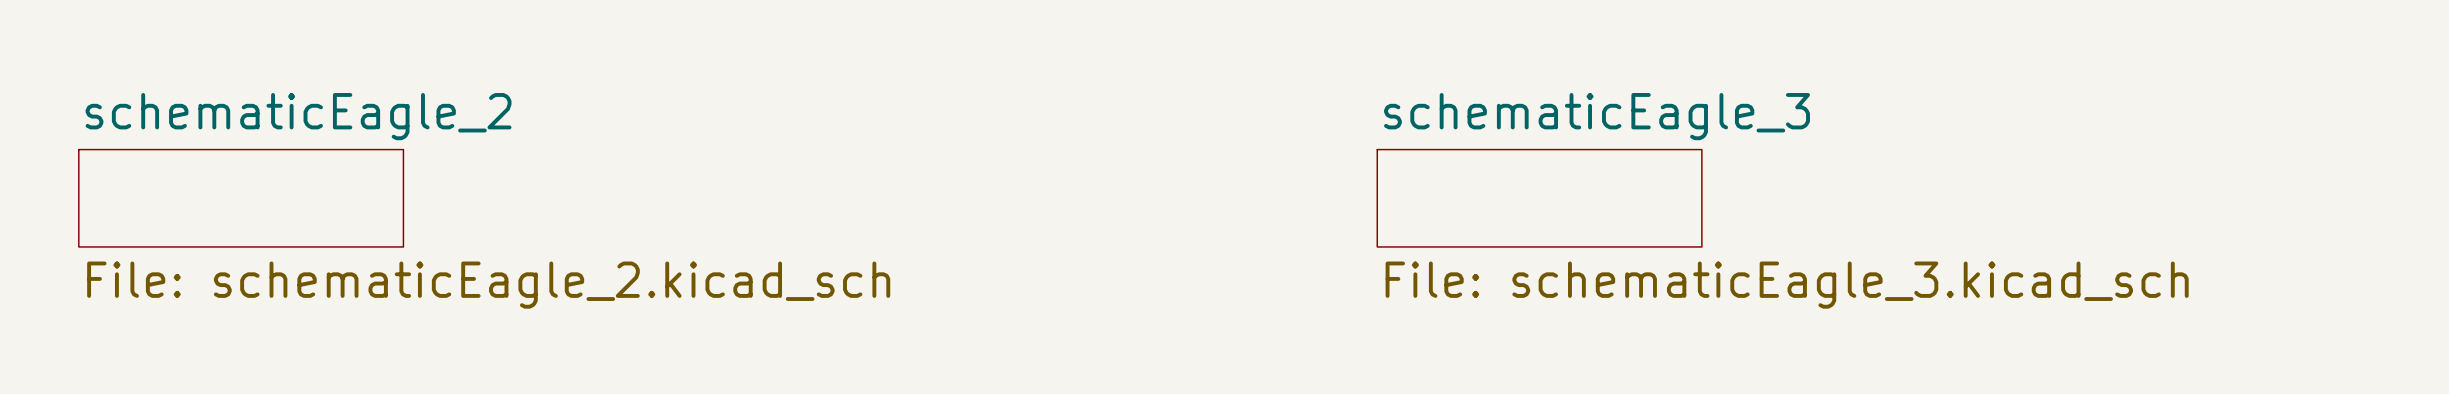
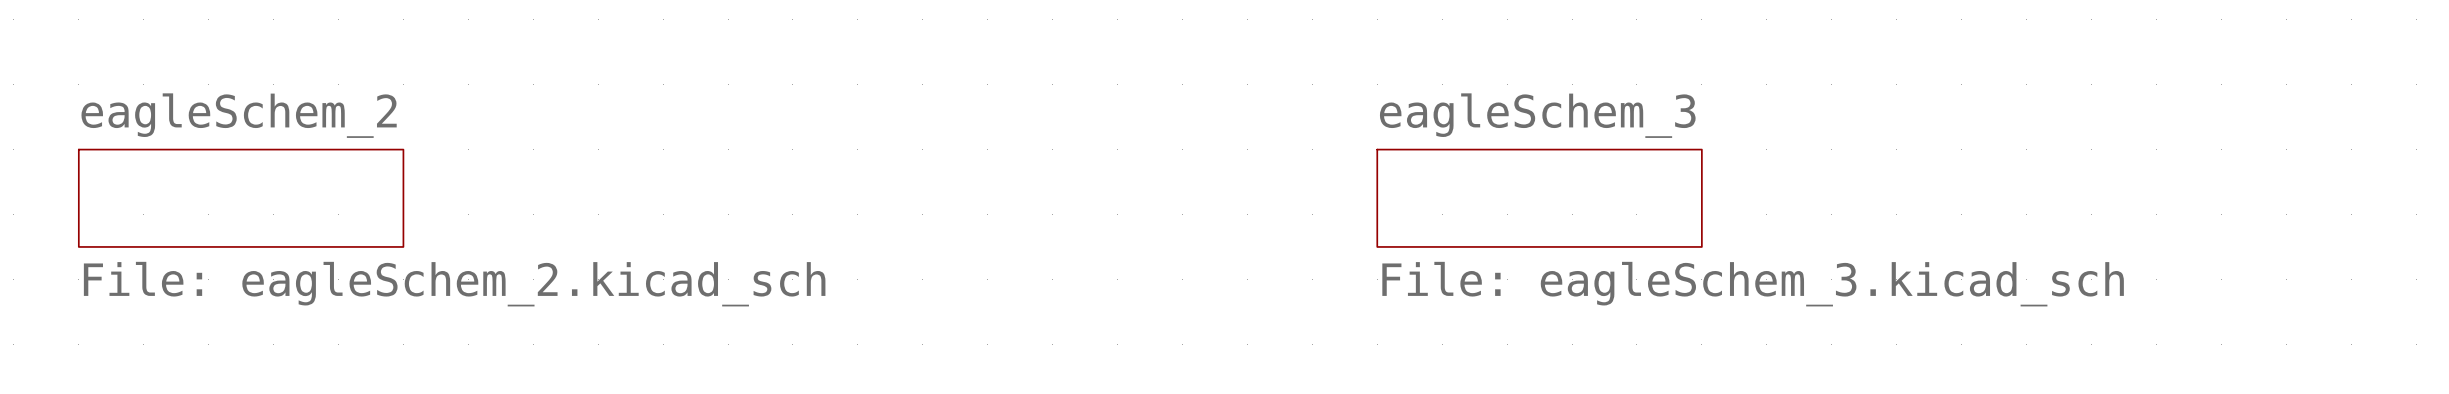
sheet schematicEagle_2 name: schematicEagle_2 (298, 116) -> eagleSchem_2 (239, 115)
sheet schematicEagle_3 name: schematicEagle_3 (1597, 116) -> eagleSchem_3 (1537, 115)
sheet schematicEagle_2 value: File: schematicEagle_2.kicad_sch (488, 285) -> File: eagleSchem_2.kicad_sch (454, 284)
sheet schematicEagle_3 value: File: schematicEagle_3.kicad_sch (1787, 285) -> File: eagleSchem_3.kicad_sch (1753, 284)

